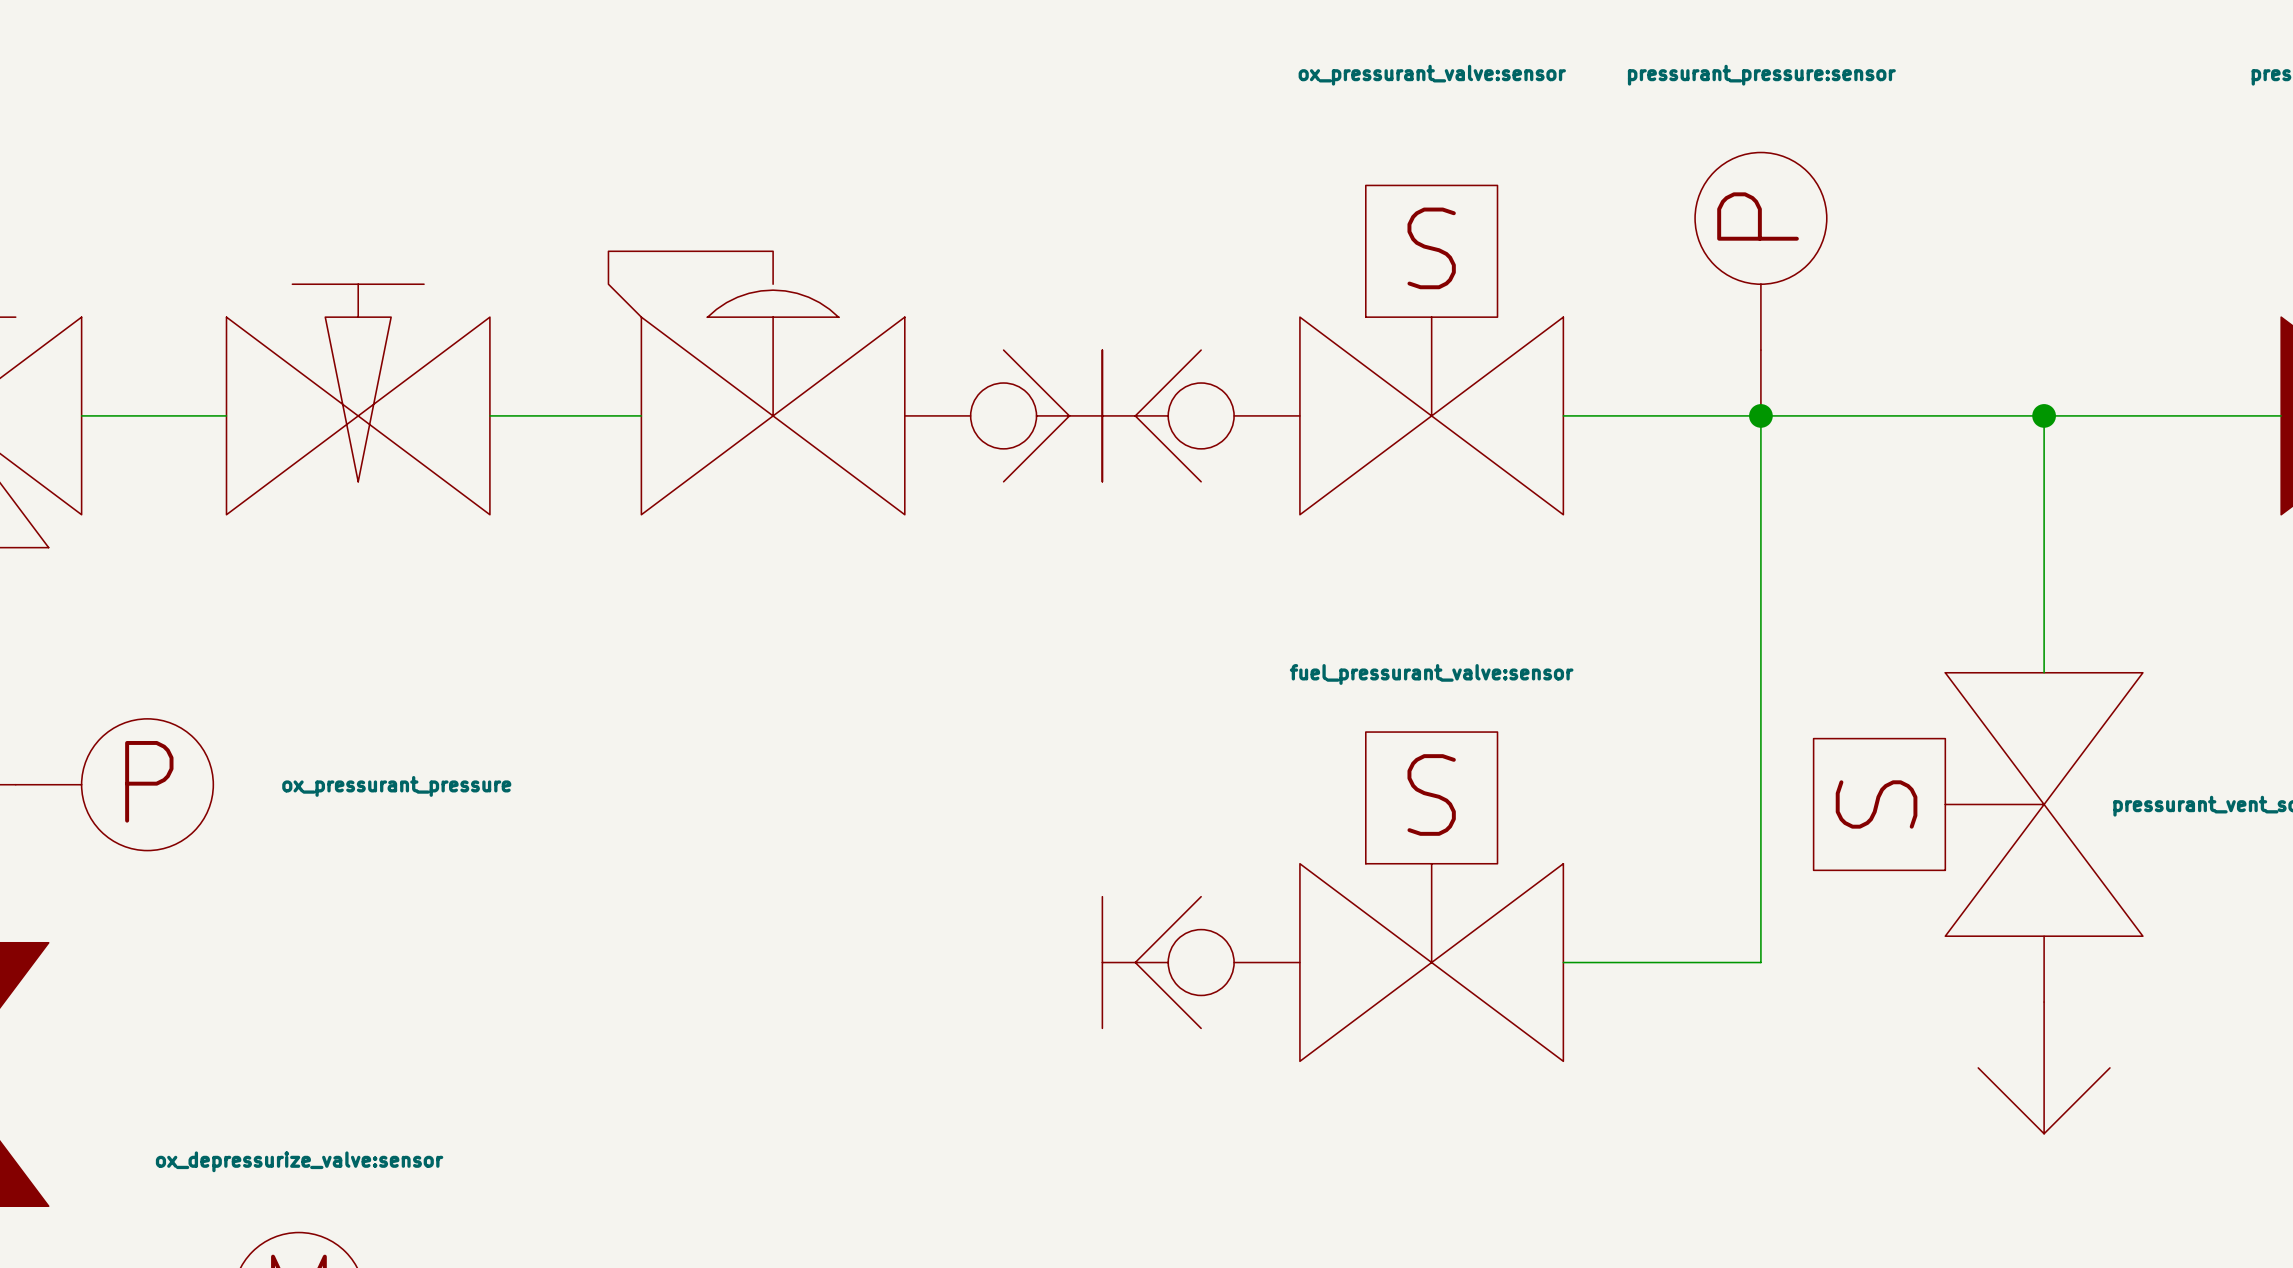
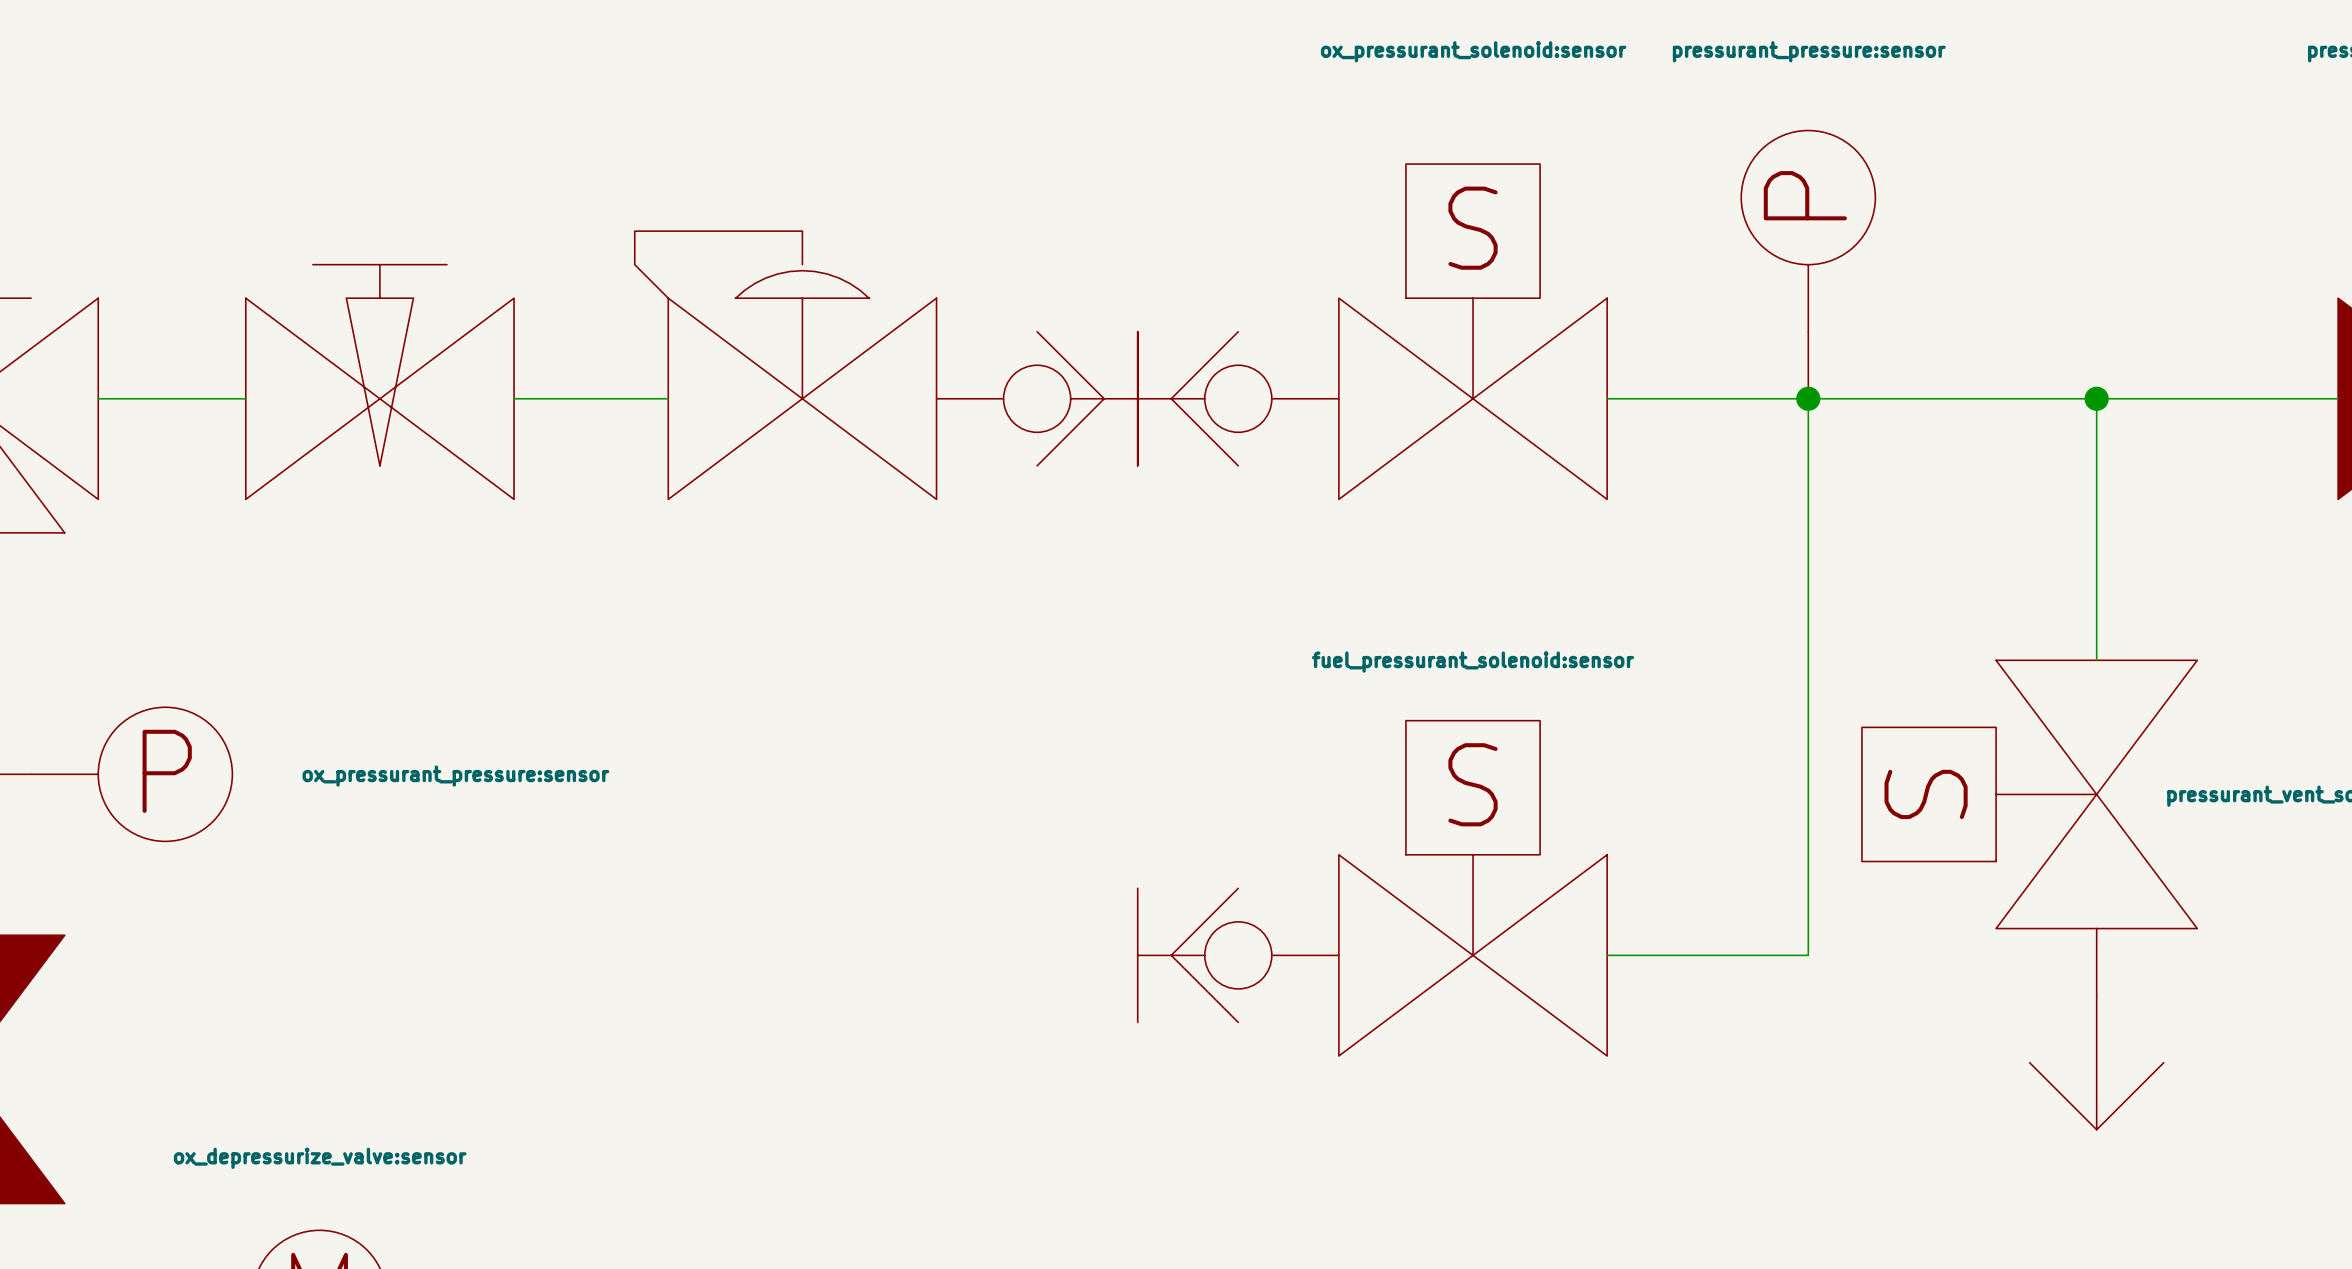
part value: ox_pressurant_valve:sensor (1432, 75) -> ox_pressurant_solenoid:sensor (1473, 51)
part value: fuel_pressurant_valve:sensor (1431, 674) -> fuel_pressurant_solenoid:sensor (1473, 662)
part value: ox_pressurant_pressure (396, 786) -> ox_pressurant_pressure:sensor (455, 776)

